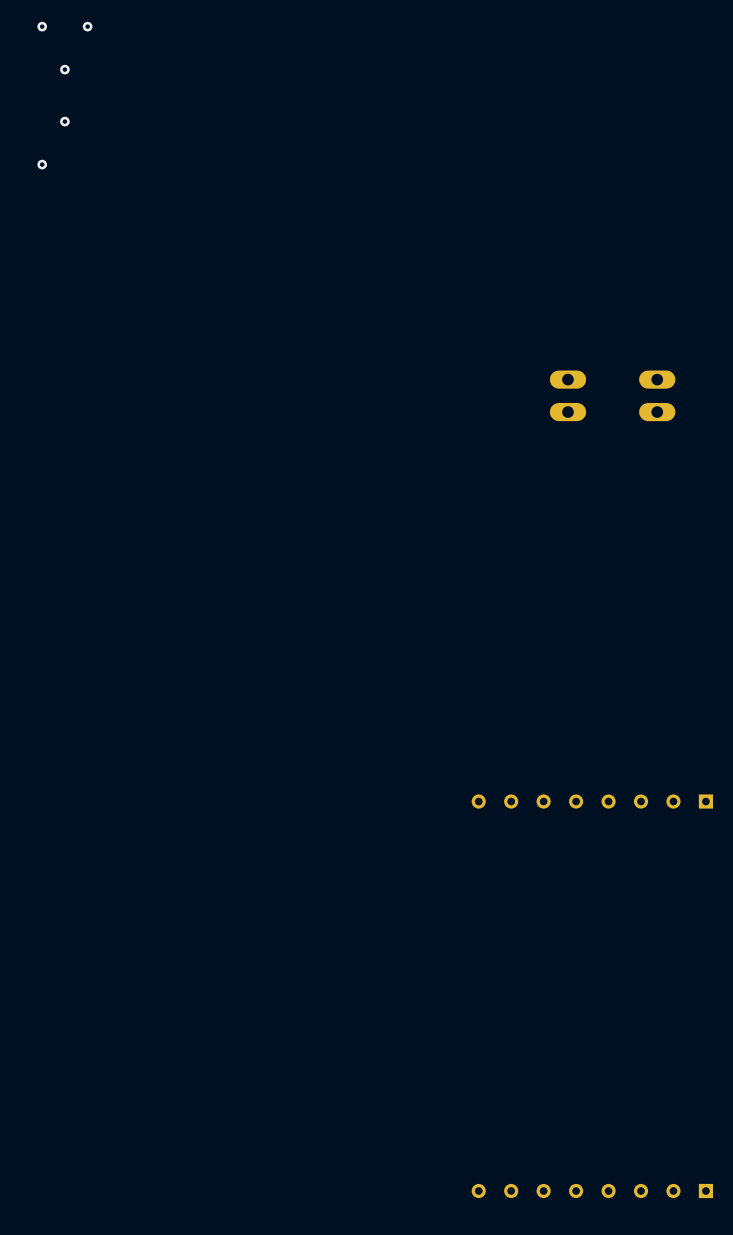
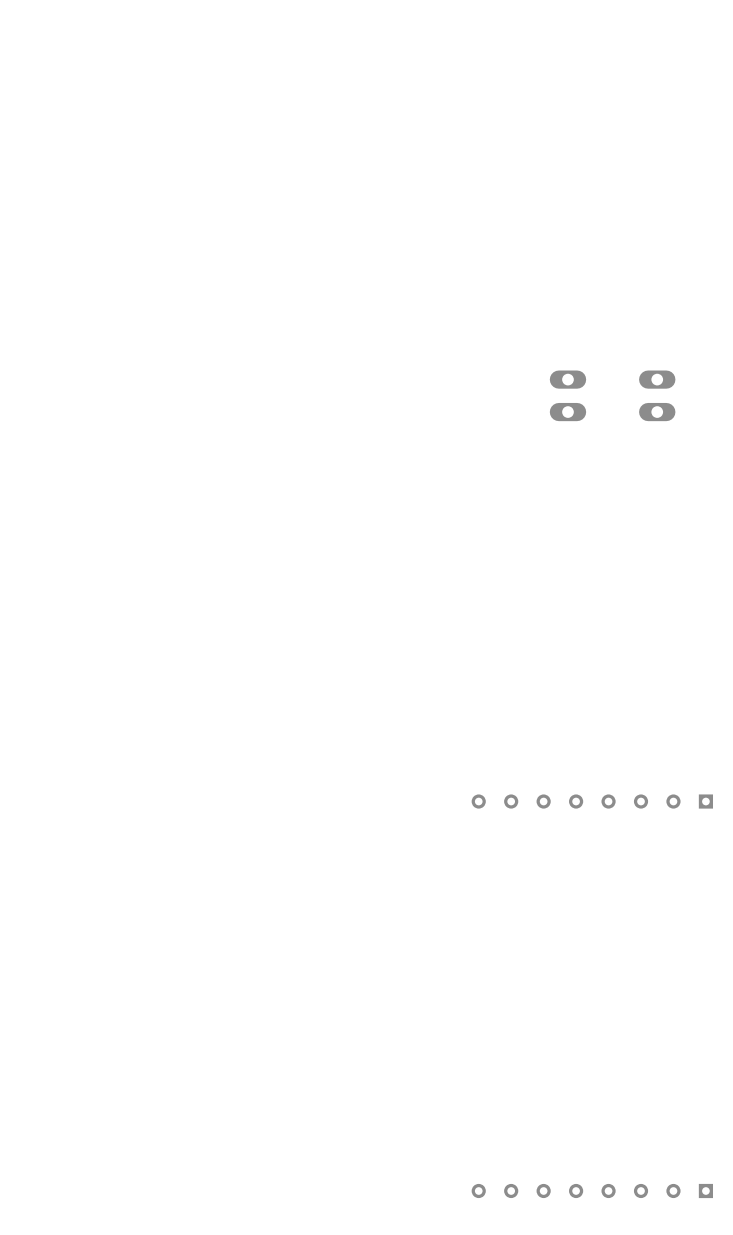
via: (42, 26) -> none
via: (87, 26) -> none
via: (64, 69) -> none
via: (64, 121) -> none
via: (42, 164) -> none

